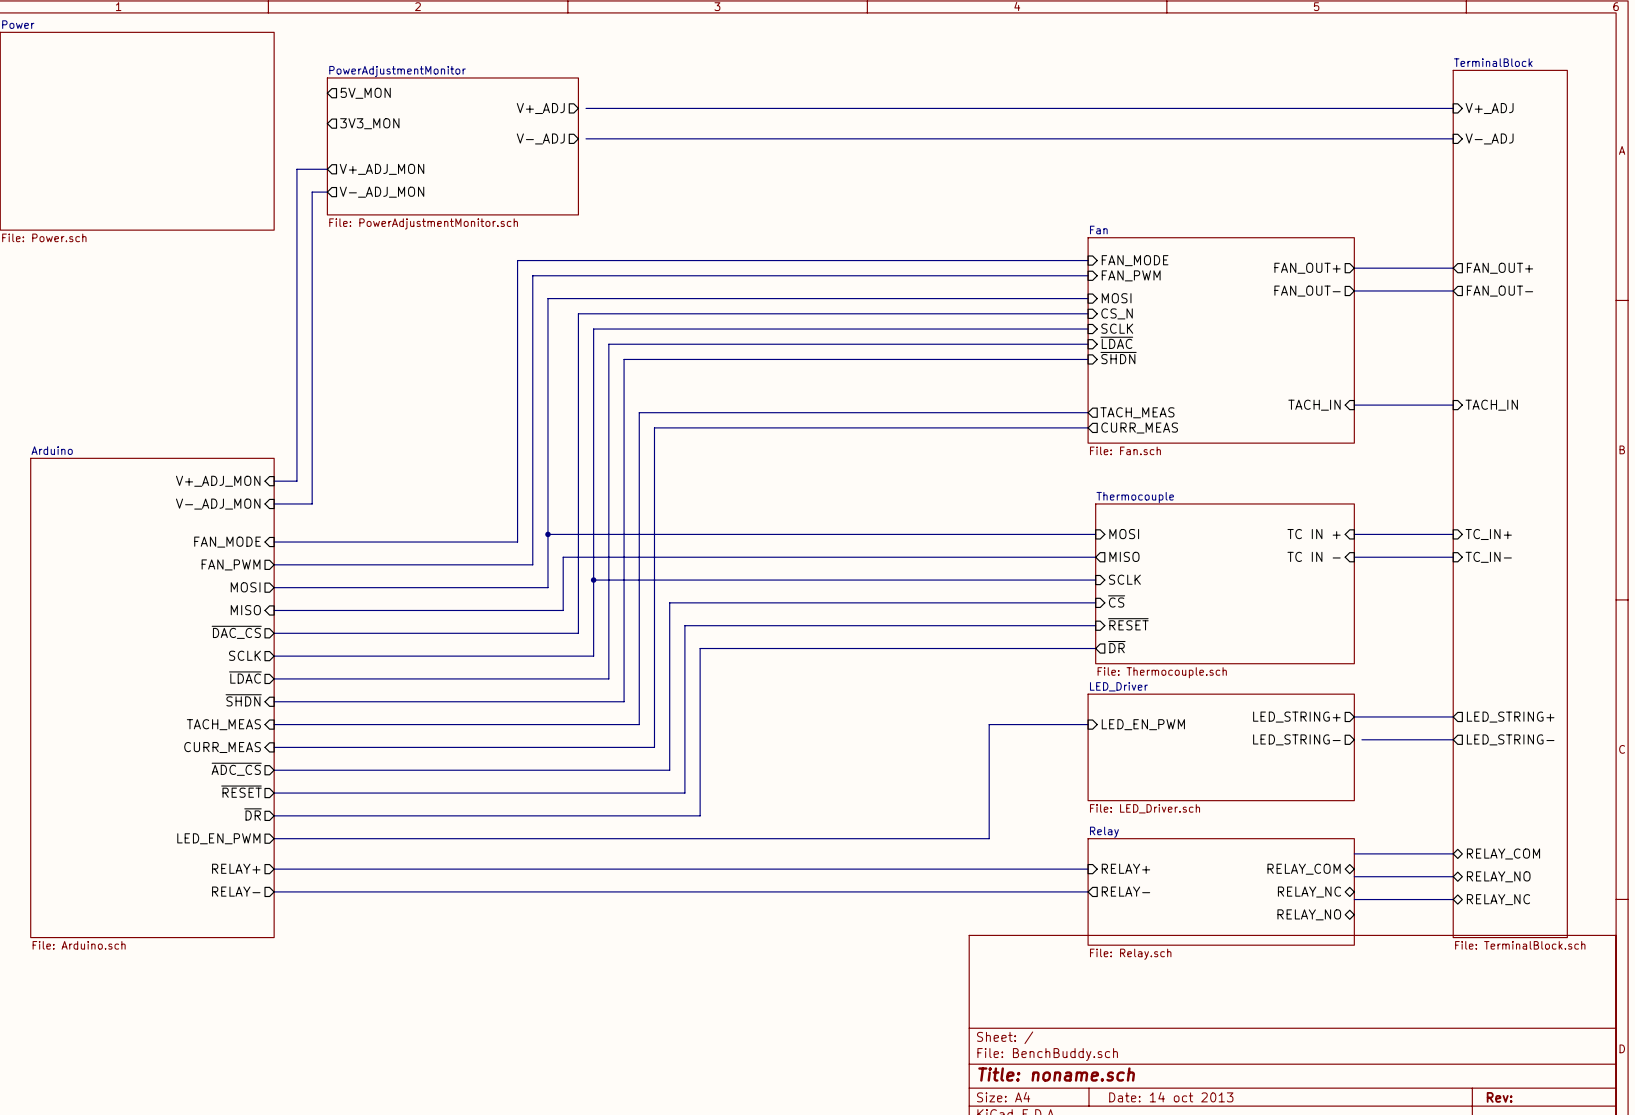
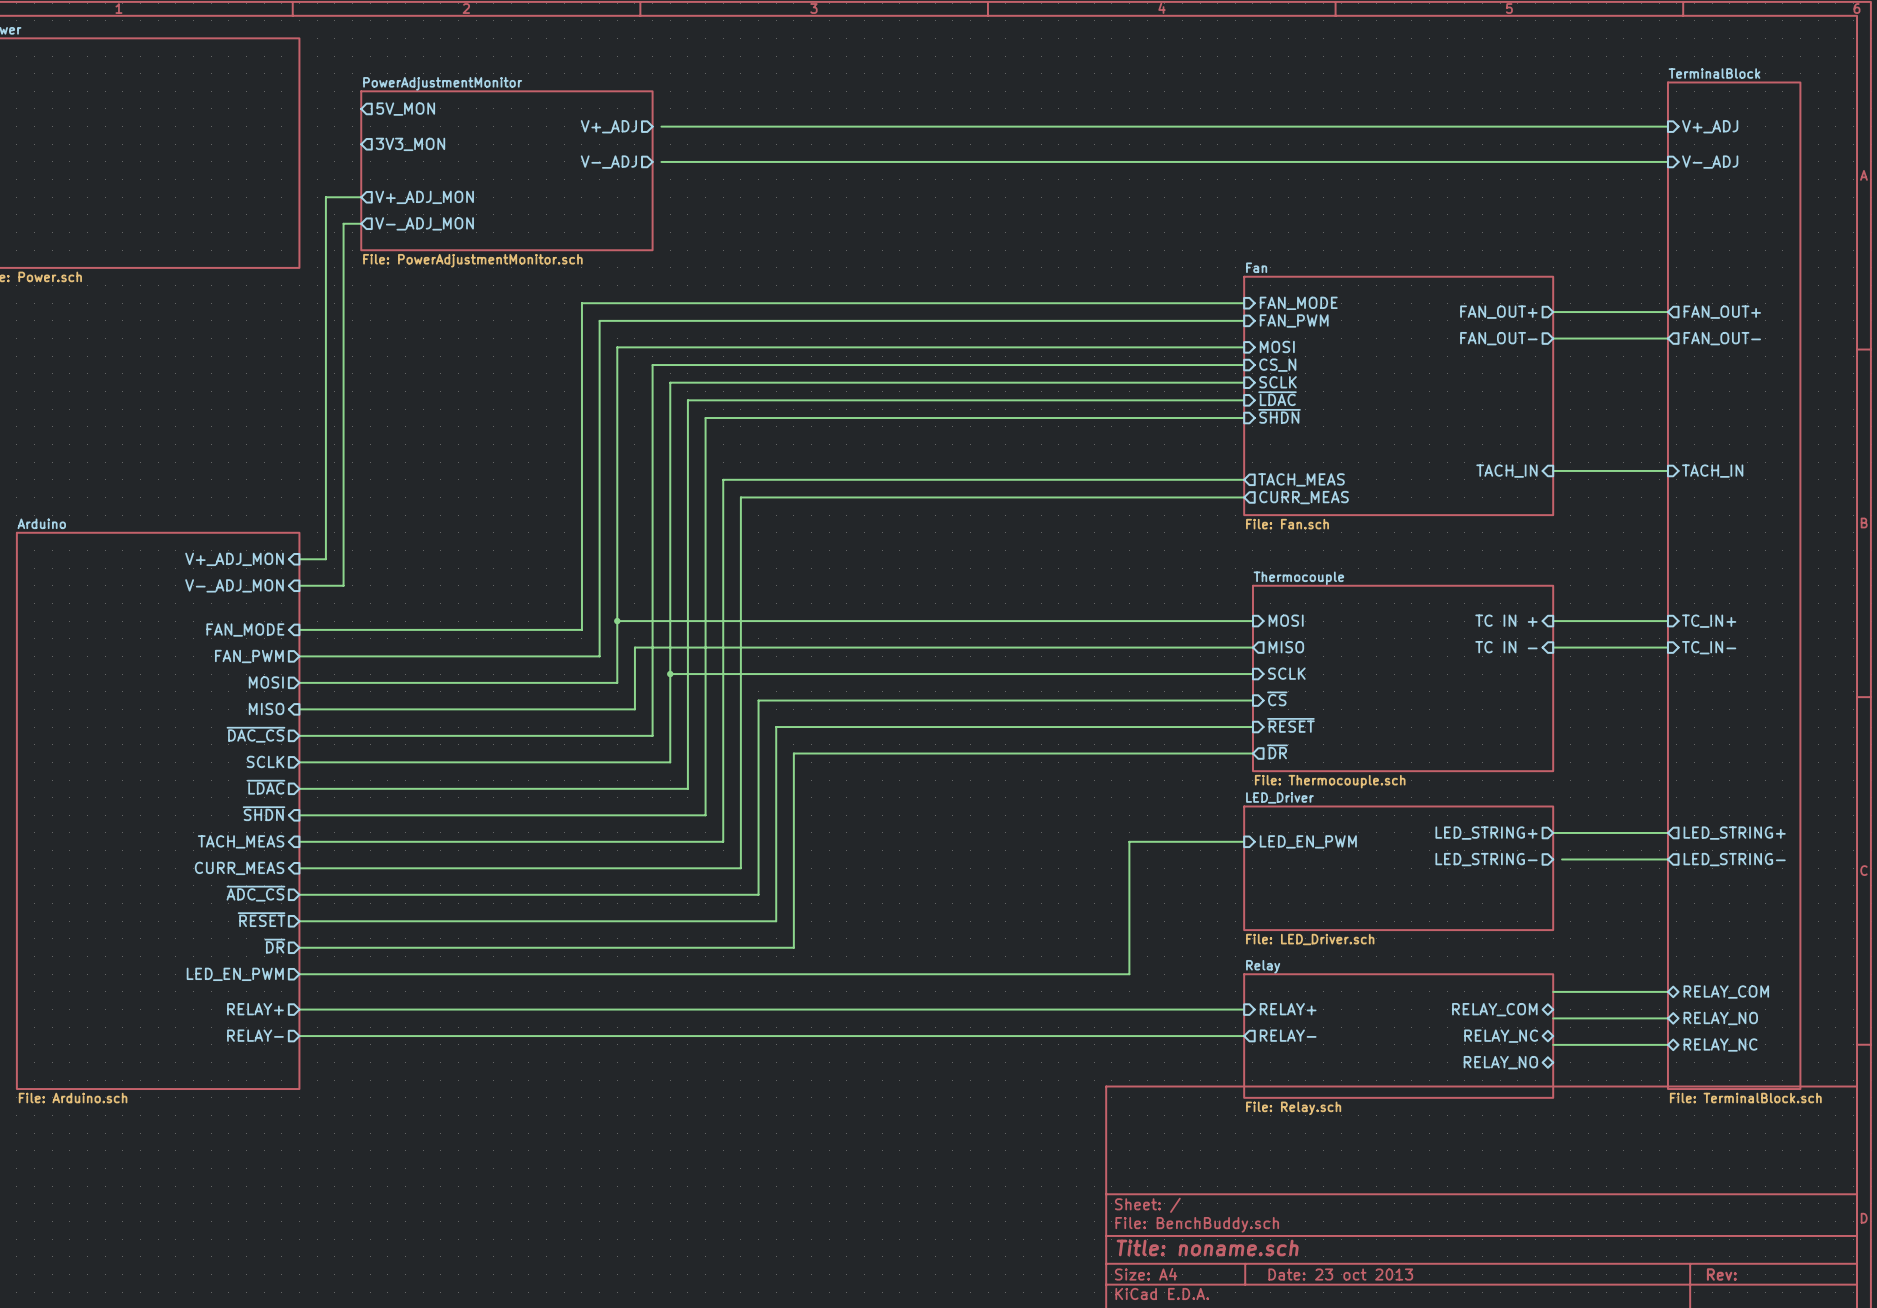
title block: Date: 14 oct 2013 (1171, 1097) -> Date: 23 oct 2013 (1340, 1274)

